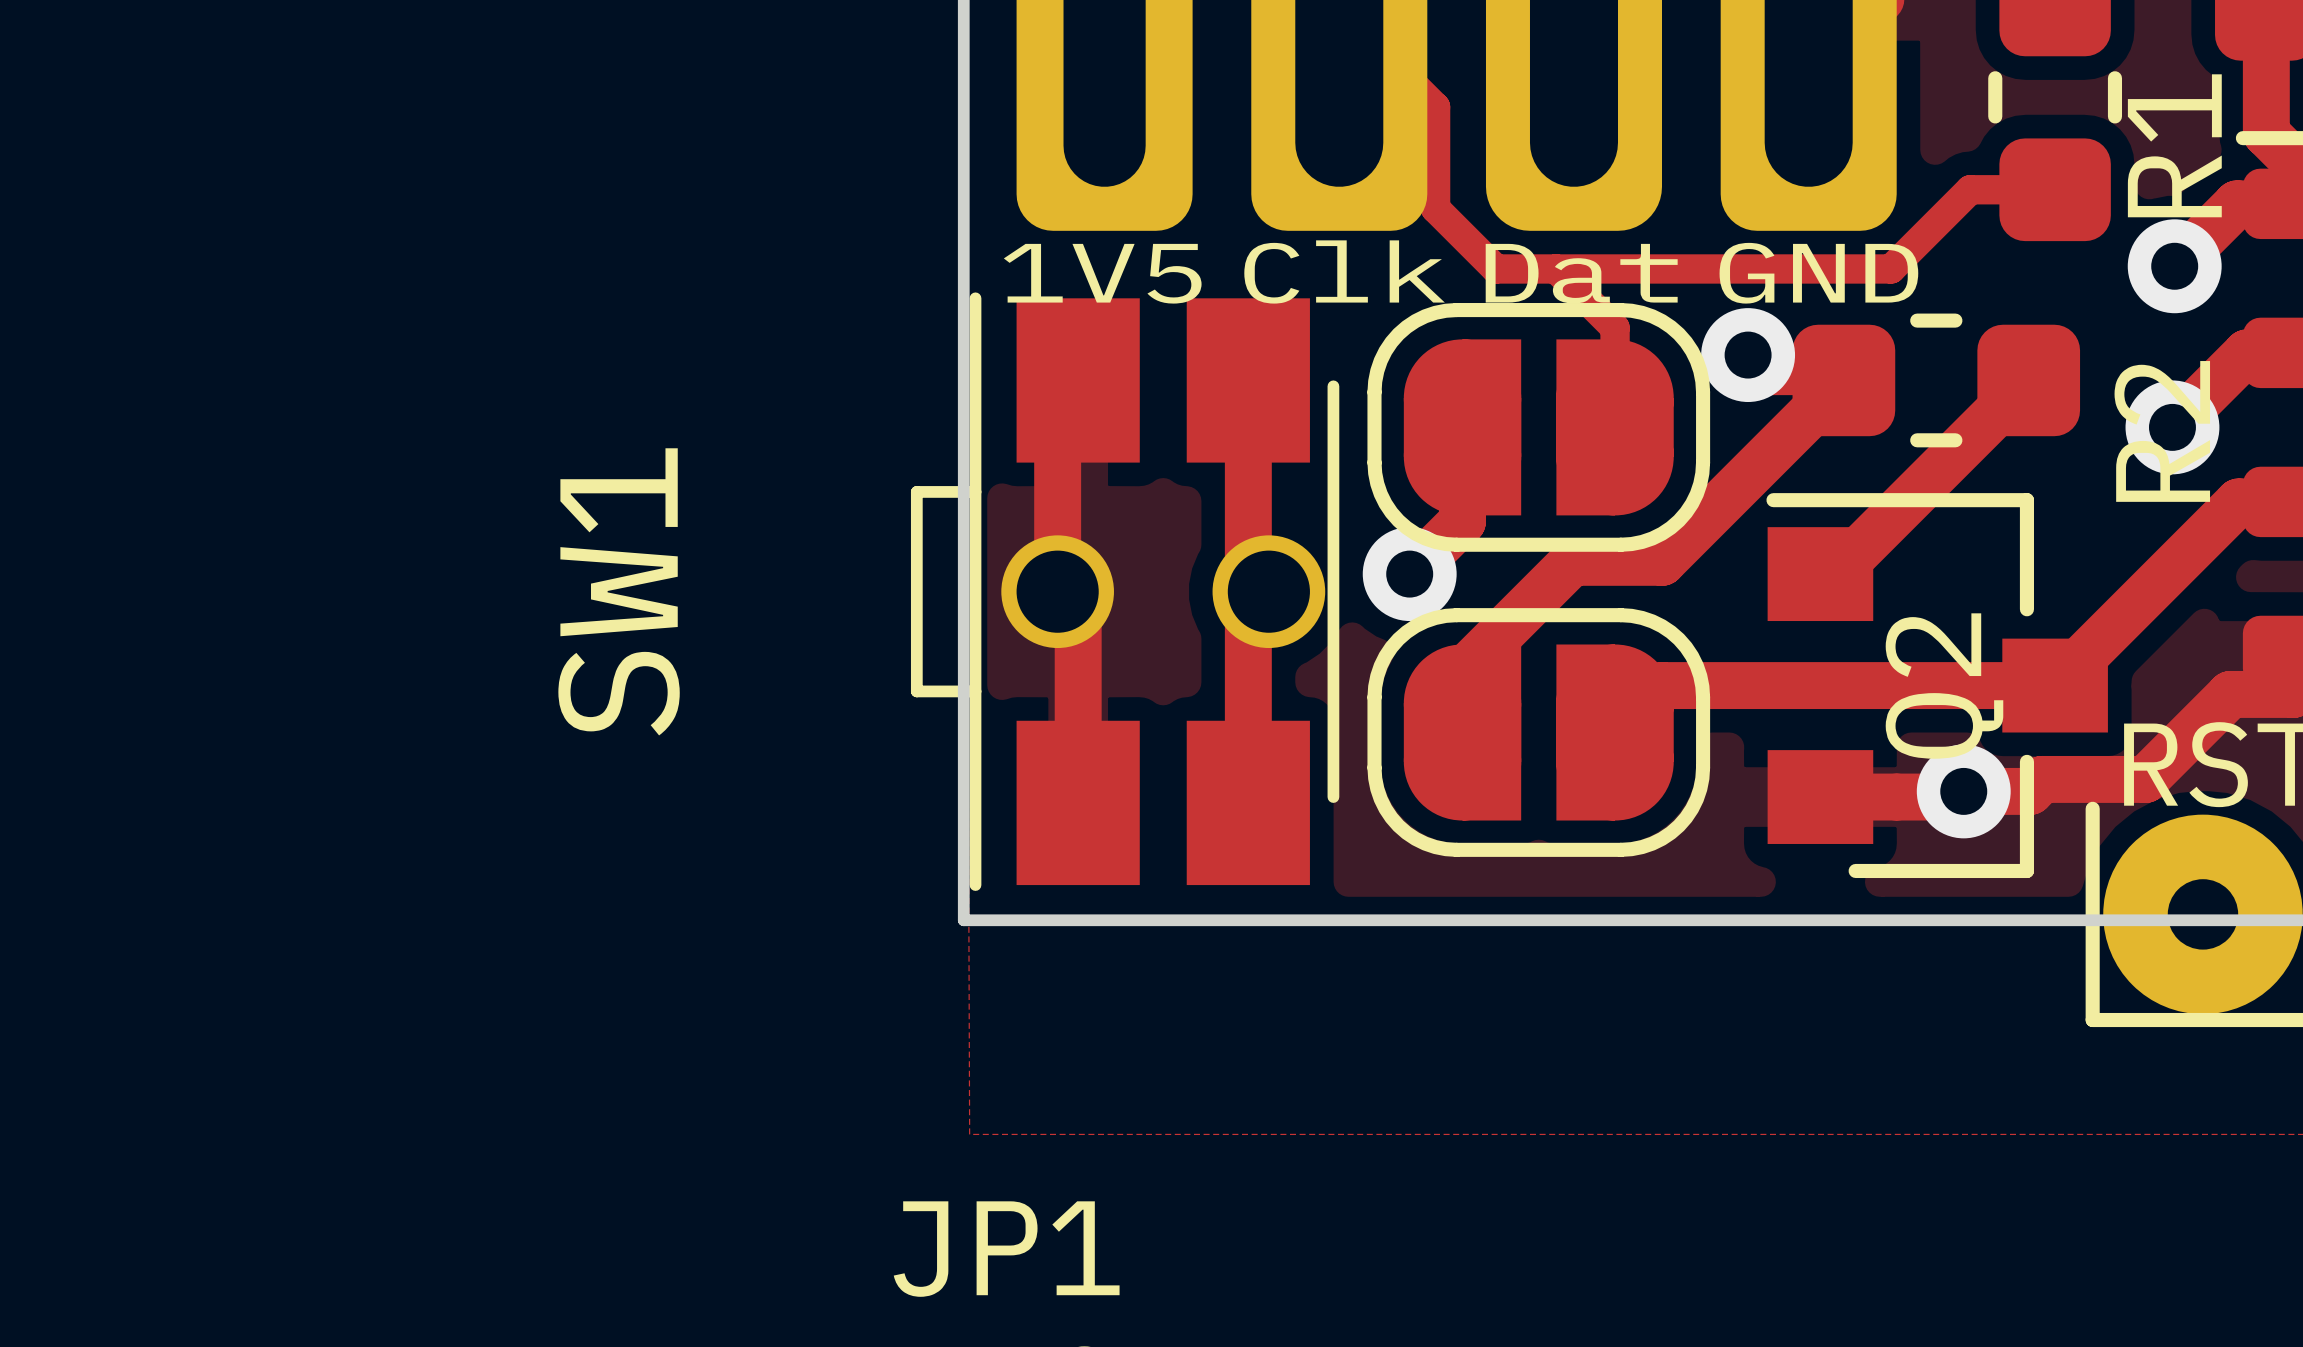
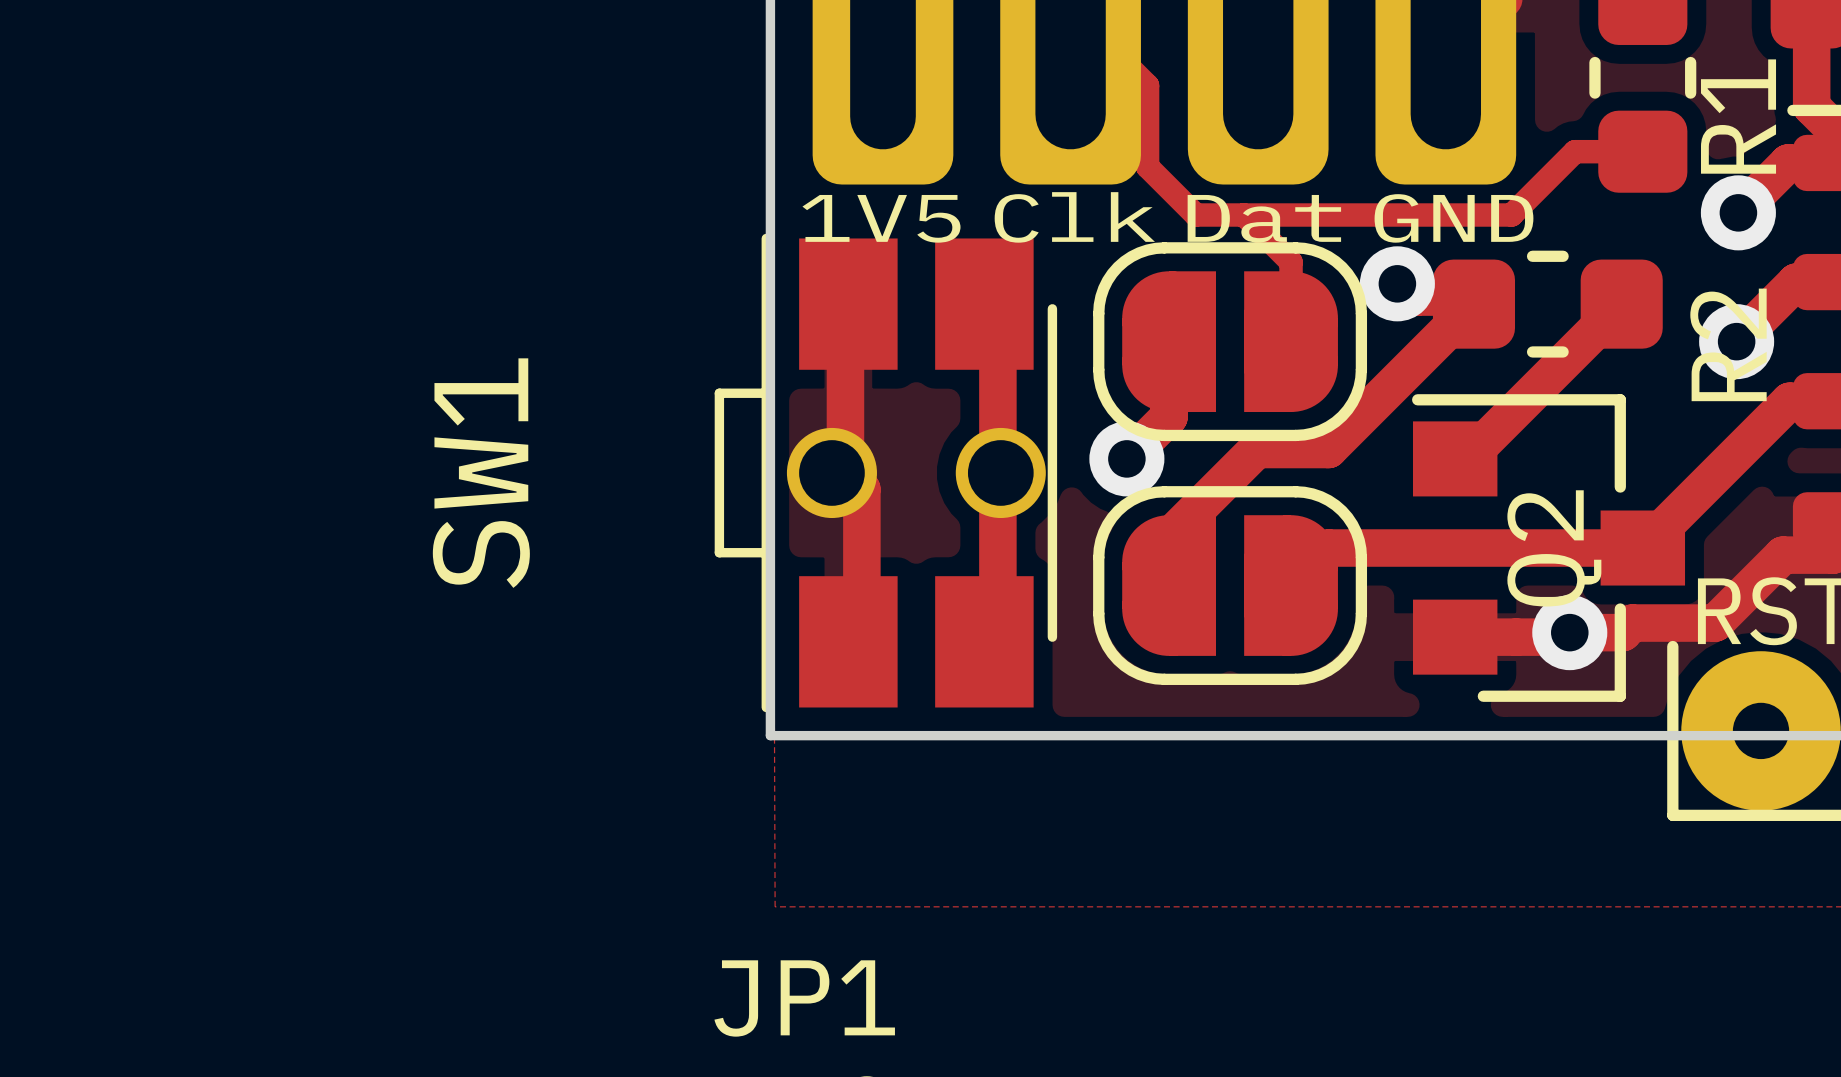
SW1 position: (1125, 591) -> (885, 472)

